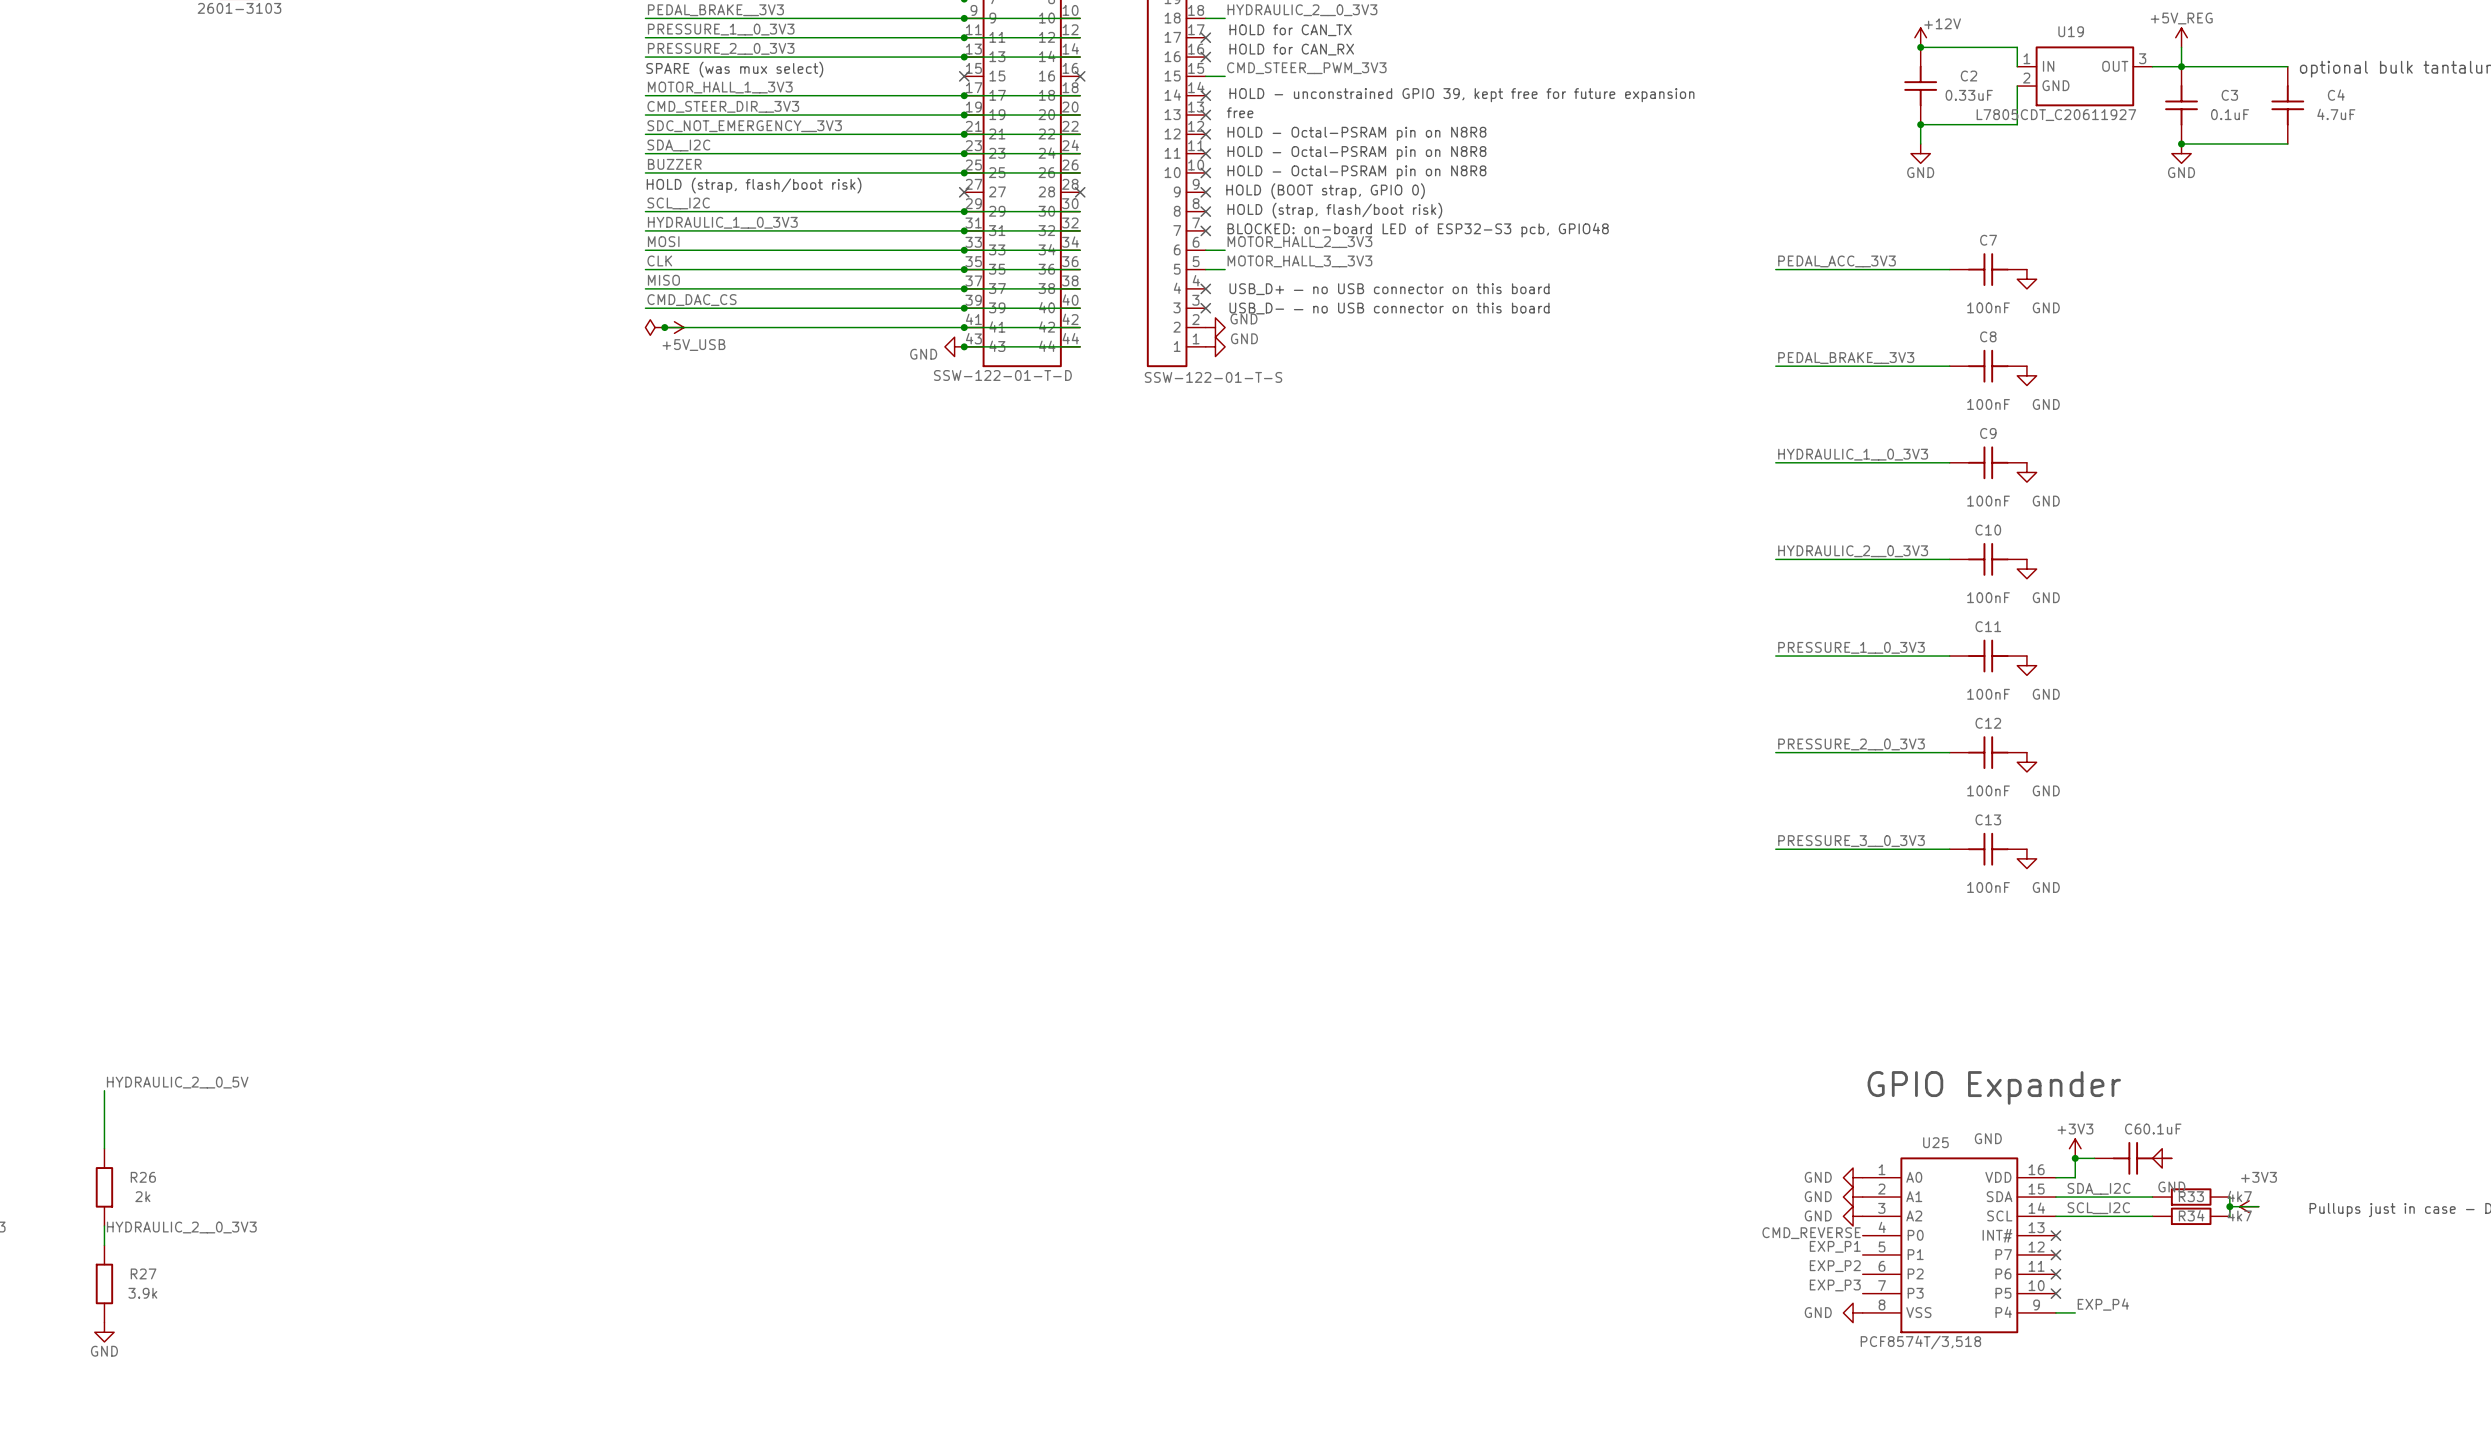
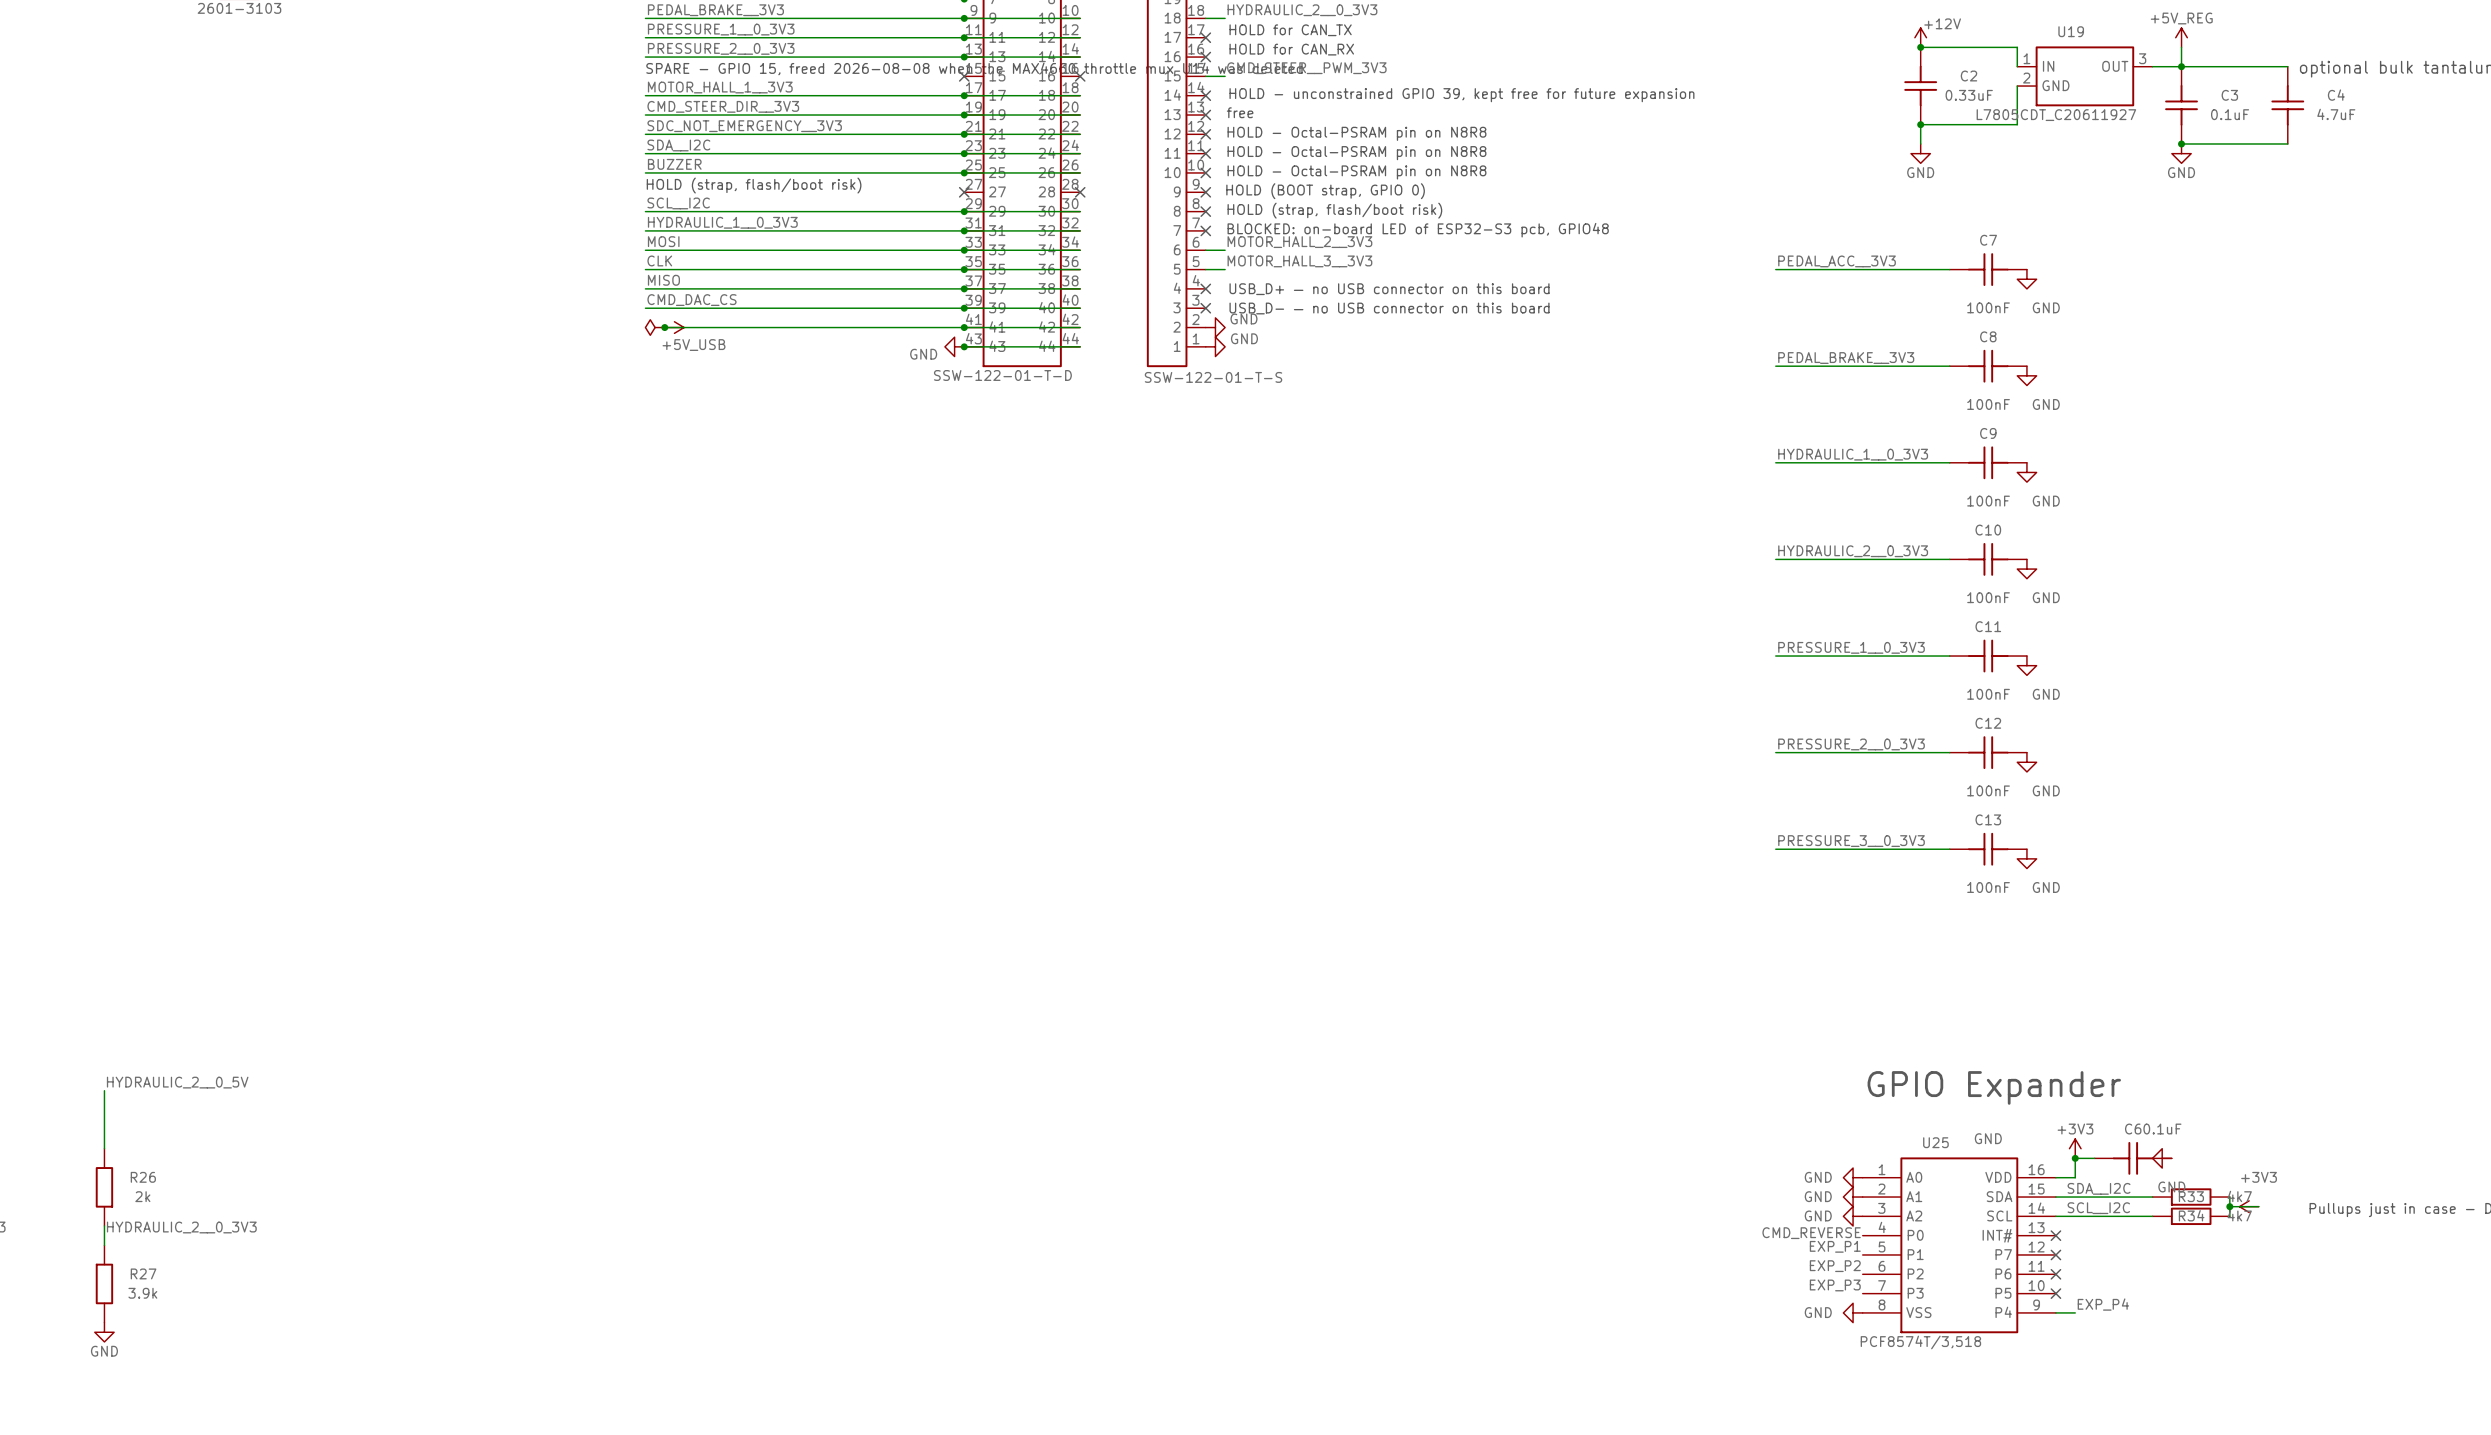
text: SPARE (was mux select) (734, 69) -> SPARE - GPIO 15, freed 2026-08-08 when the MAX4660 throttle mux U14 was deleted (974, 68)

